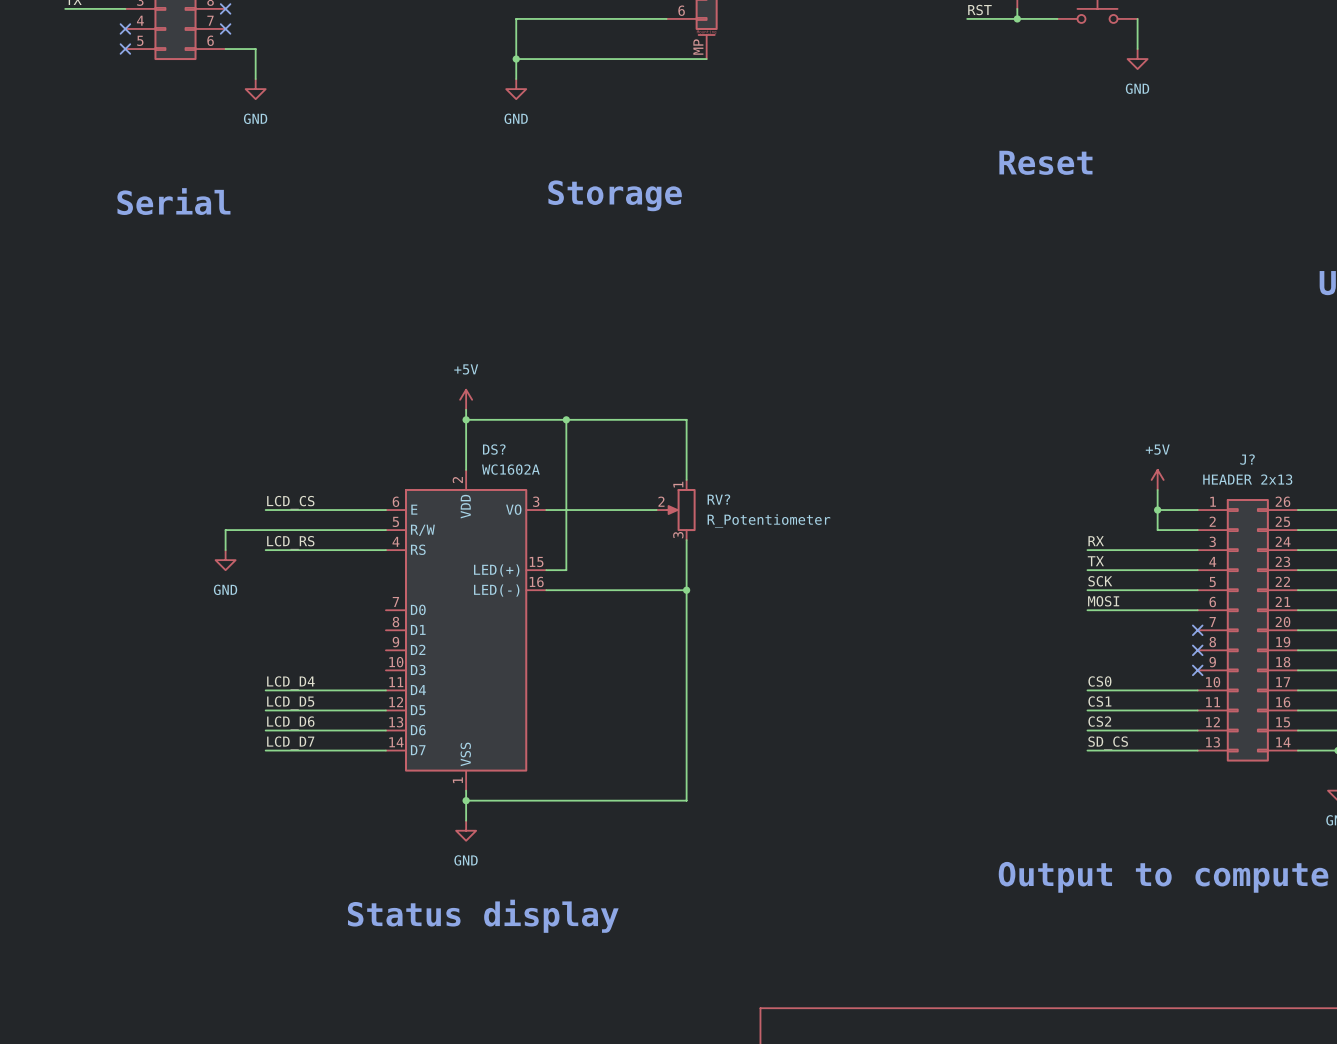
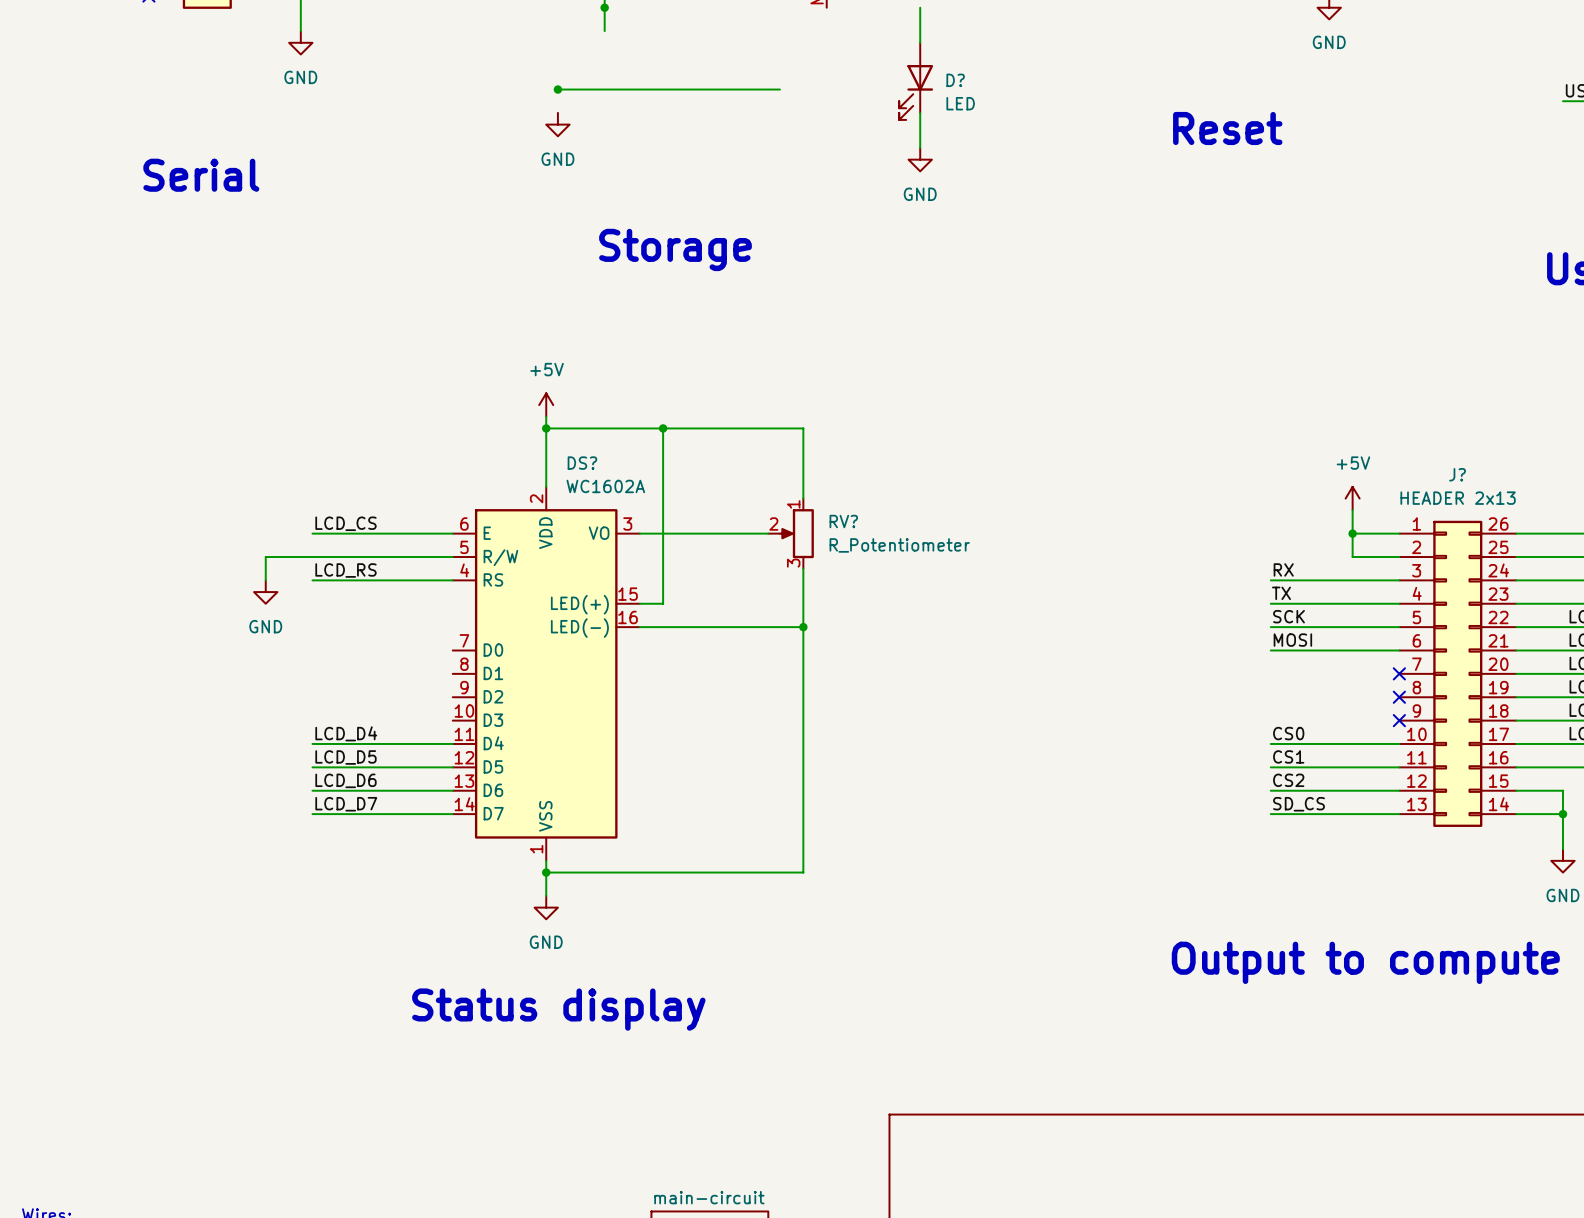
wire: (516, 59) (706, 59) -> (557, 89) (779, 89)
wire: none -> (920, 7) (920, 42)
power symbol position: GND (516, 89) -> GND (557, 124)
D?: none -> LED (916, 81)
junction: none -> (557, 89)
wire: none -> (920, 112) (920, 147)
power symbol: none -> GND (920, 159)
text position: Storage (615, 195) -> Storage (675, 249)

